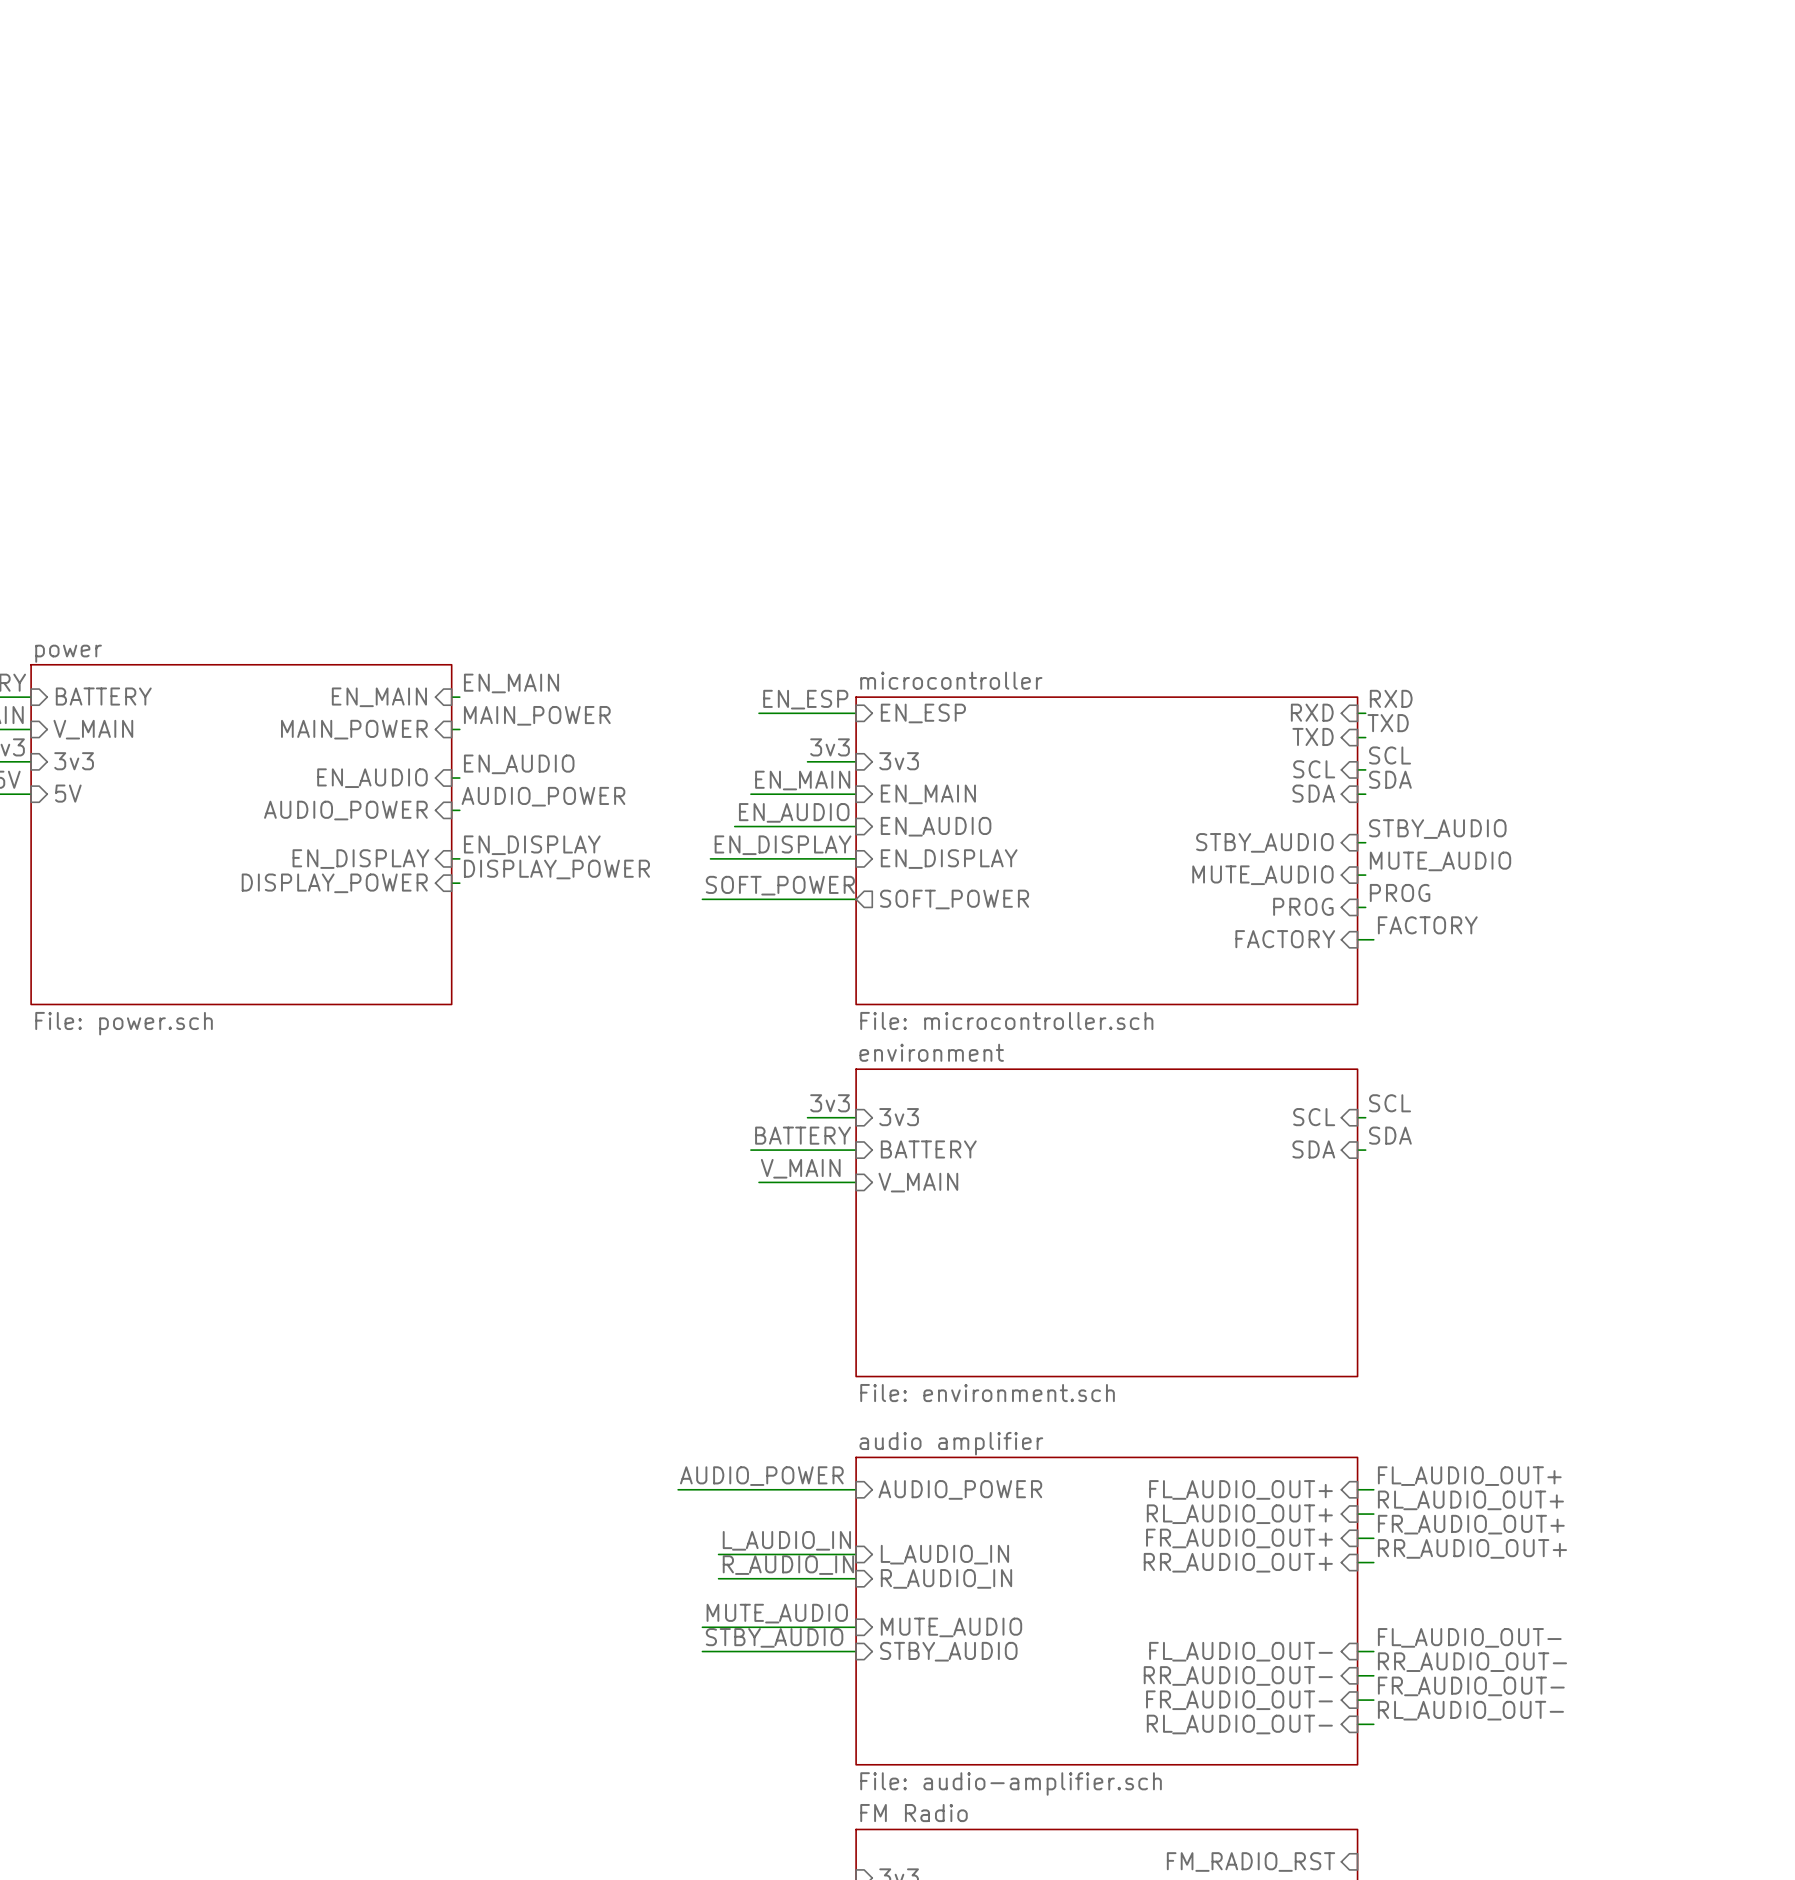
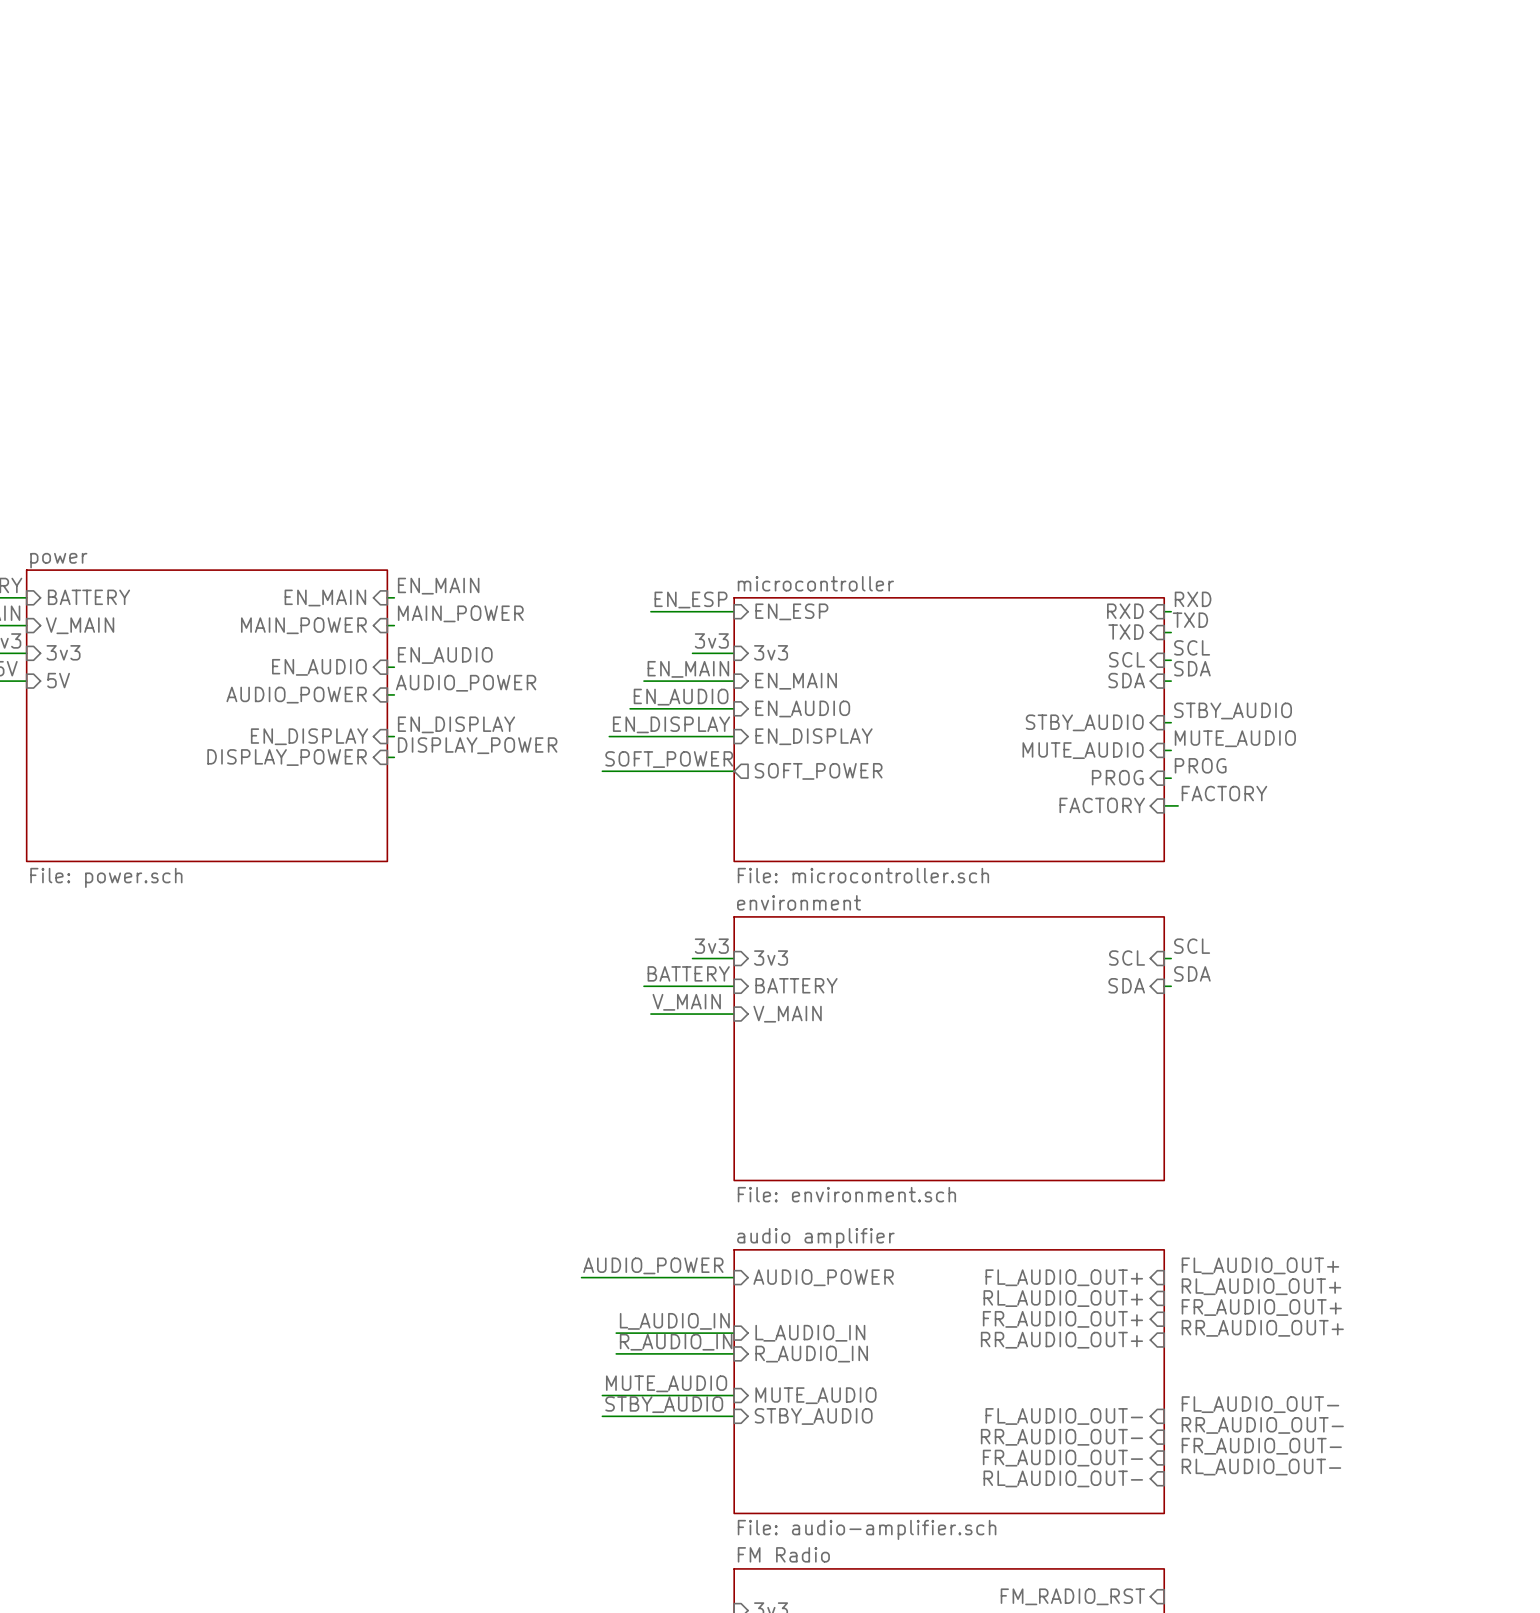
wire: (1357, 1489) (1373, 1489) -> none
wire: (1357, 1514) (1373, 1514) -> none
wire: (1357, 1538) (1373, 1538) -> none
wire: (1357, 1562) (1373, 1562) -> none
wire: (1357, 1651) (1373, 1651) -> none
wire: (1357, 1675) (1373, 1675) -> none
wire: (1357, 1700) (1373, 1700) -> none
wire: (1357, 1724) (1373, 1724) -> none

